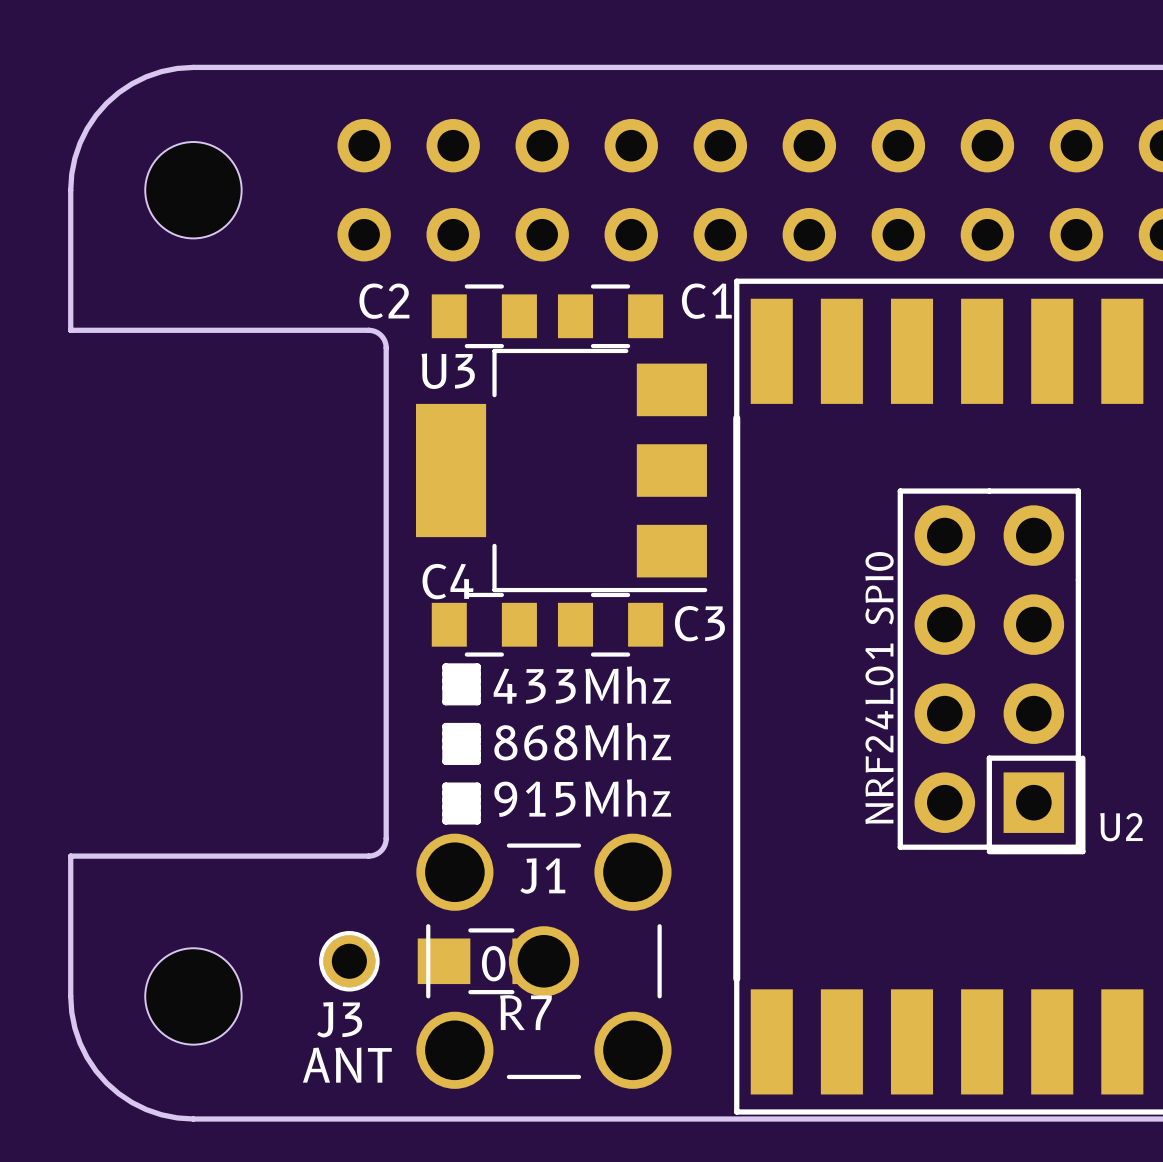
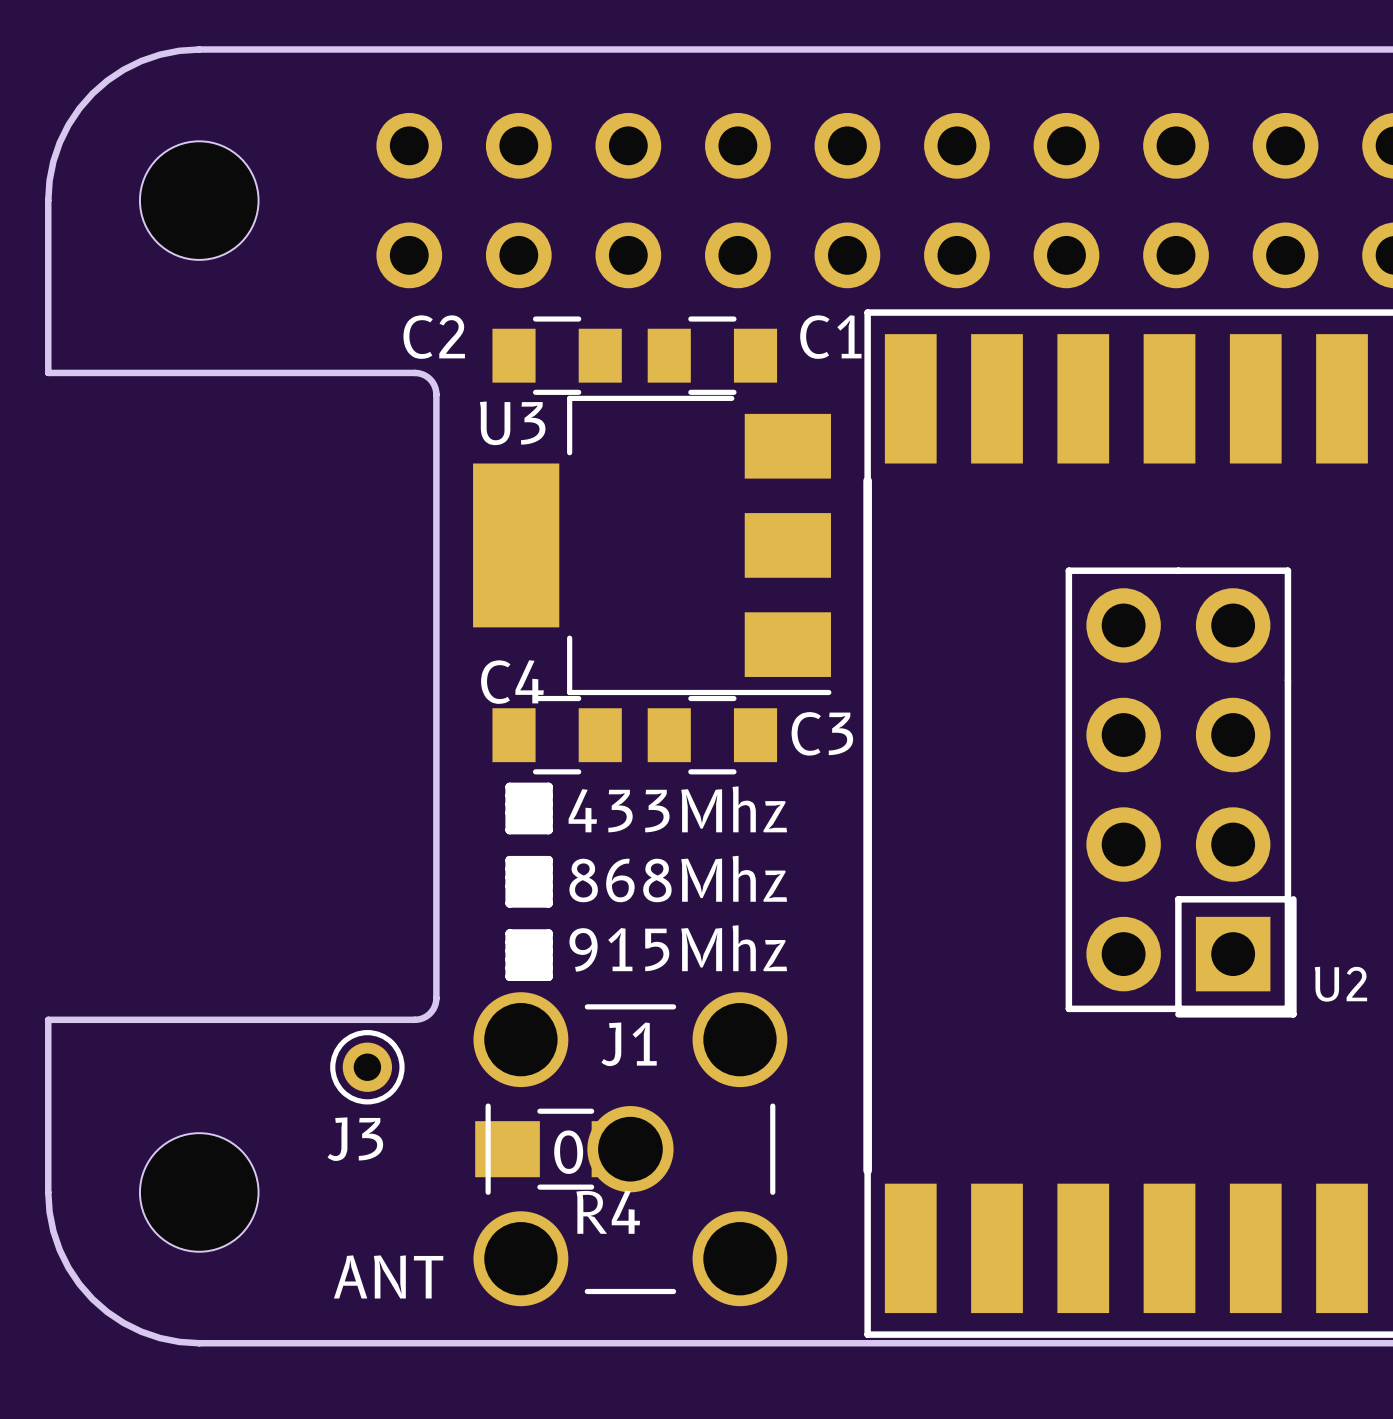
U2 value: NRF24L01 SPI0 (879, 688) -> none
J3 footprint: [319, 931, 380, 992] -> [330, 1030, 405, 1105]
R7 name: R7 (525, 1012) -> R4 (608, 1212)

